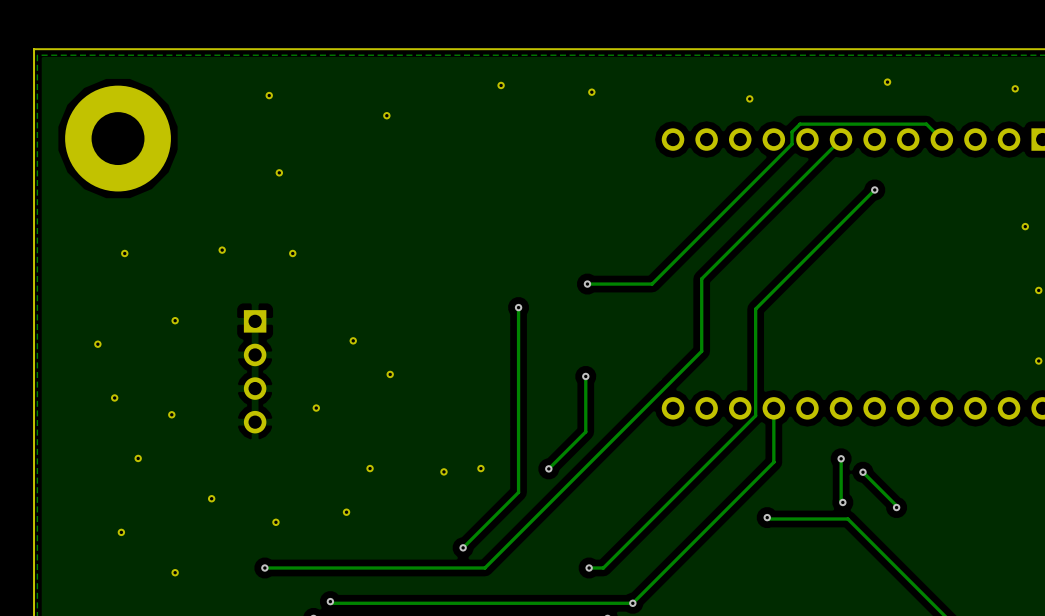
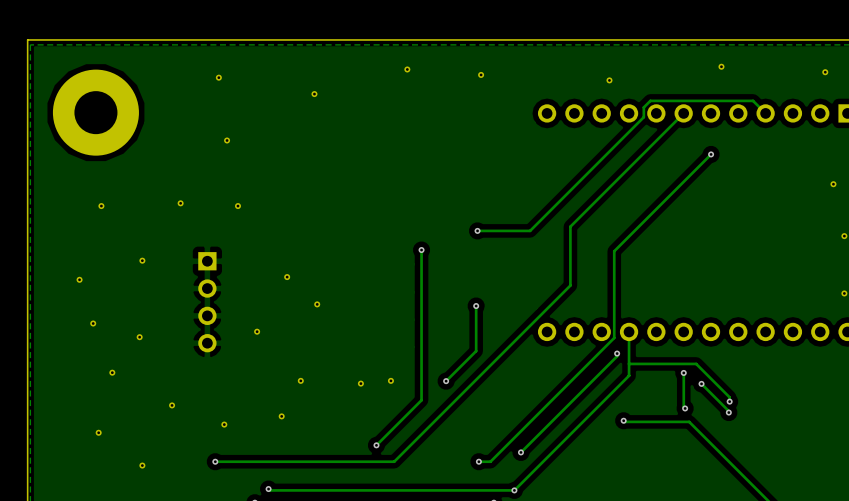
track: none -> (617, 353) (617, 356) (520, 452)
via: none -> (617, 353)
track: none -> (629, 363) (696, 363) (729, 397) (729, 401)
via: none -> (729, 401)
via: none -> (520, 452)

